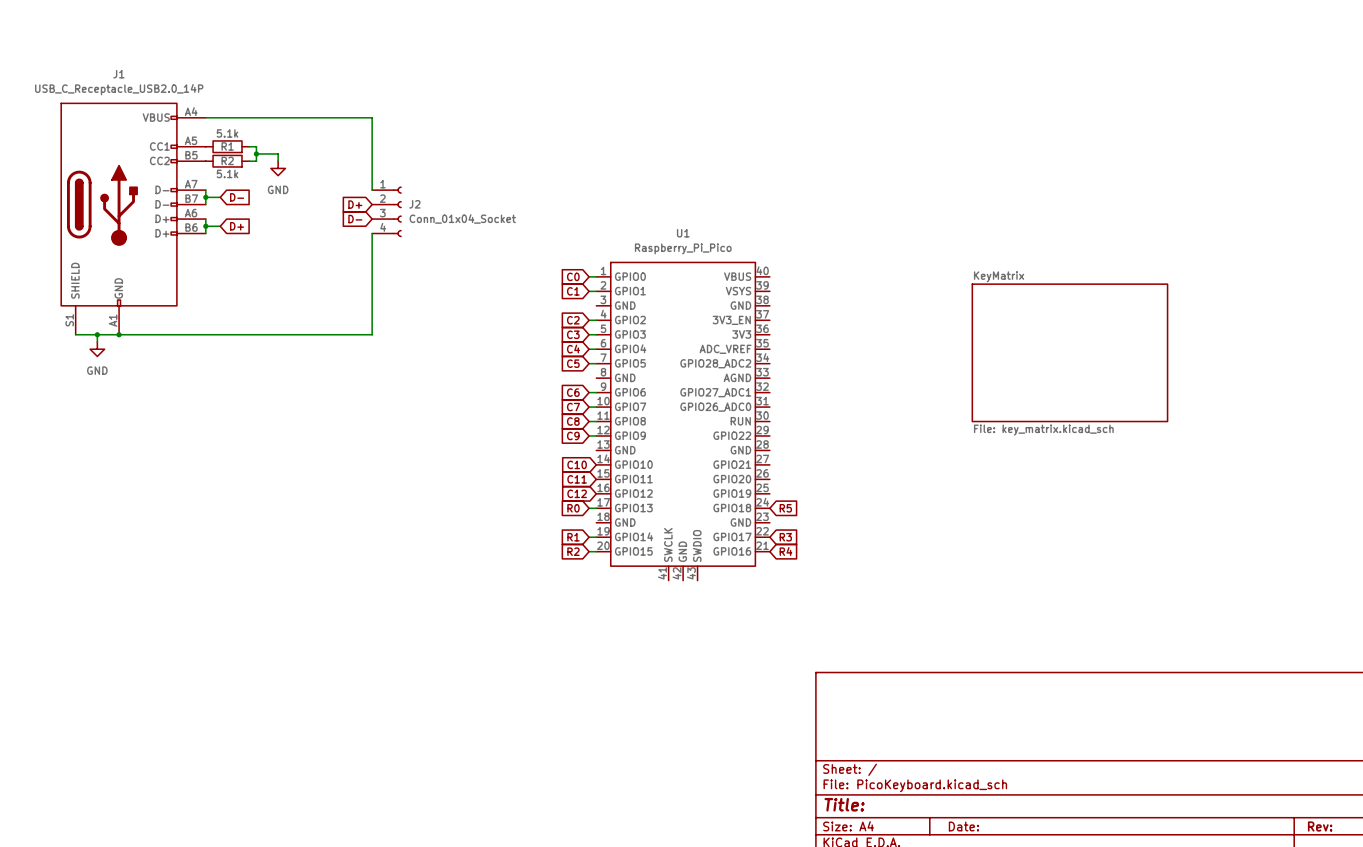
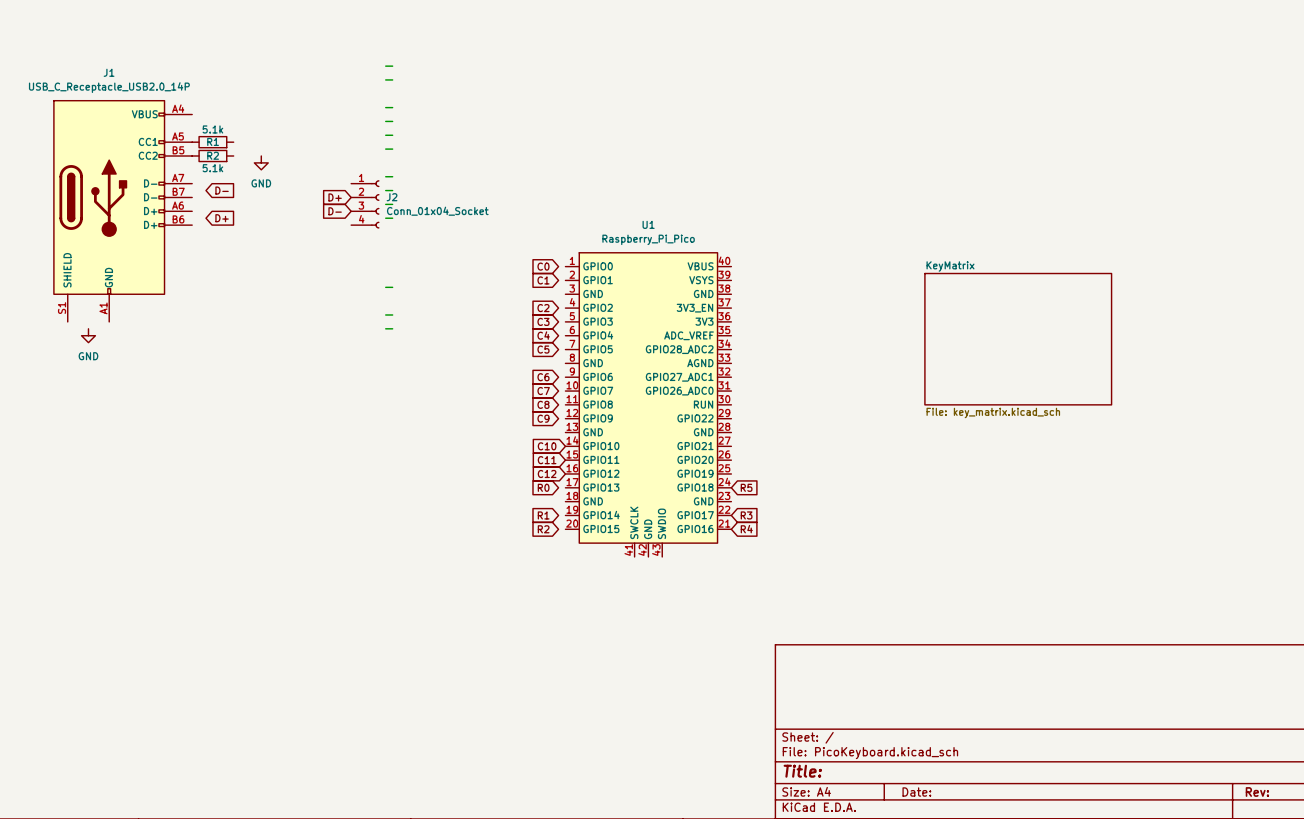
wire: none -> (385, 66) (392, 66)
wire: none -> (385, 79) (392, 79)
wire: none -> (385, 107) (392, 107)
wire: (205, 117) (372, 117) (372, 190) -> none
wire: none -> (385, 121) (392, 121)
wire: none -> (385, 135) (392, 135)
wire: (249, 146) (256, 146) (256, 161) (249, 161) -> none
wire: (256, 153) (278, 153) (278, 161) -> none
junction: (256, 153) -> none
wire: none -> (385, 149) (392, 149)
wire: none -> (385, 176) (392, 176)
wire: (205, 190) (205, 204) -> none
wire: (205, 197) (220, 197) -> none
junction: (205, 197) -> none
wire: none -> (385, 190) (392, 190)
wire: none -> (385, 204) (392, 204)
wire: (205, 219) (205, 233) -> none
wire: (205, 226) (220, 226) -> none
junction: (205, 226) -> none
wire: none -> (385, 218) (392, 218)
wire: (372, 233) (372, 334) (75, 334) -> none
wire: (589, 276) (596, 276) -> none
wire: (589, 291) (596, 291) -> none
wire: none -> (385, 287) (392, 287)
wire: (589, 320) (596, 320) -> none
wire: none -> (385, 314) (392, 314)
wire: (97, 334) (97, 341) -> none
junction: (97, 334) -> none
junction: (119, 334) -> none
wire: (589, 334) (596, 334) -> none
wire: none -> (385, 328) (392, 328)
wire: (589, 349) (596, 349) -> none
wire: (589, 363) (596, 363) -> none
wire: (589, 392) (596, 392) -> none
wire: (589, 407) (596, 407) -> none
wire: (589, 421) (596, 421) -> none
wire: (589, 435) (596, 435) -> none
wire: (589, 508) (596, 508) -> none
wire: (589, 537) (596, 537) -> none
wire: (589, 551) (596, 551) -> none

